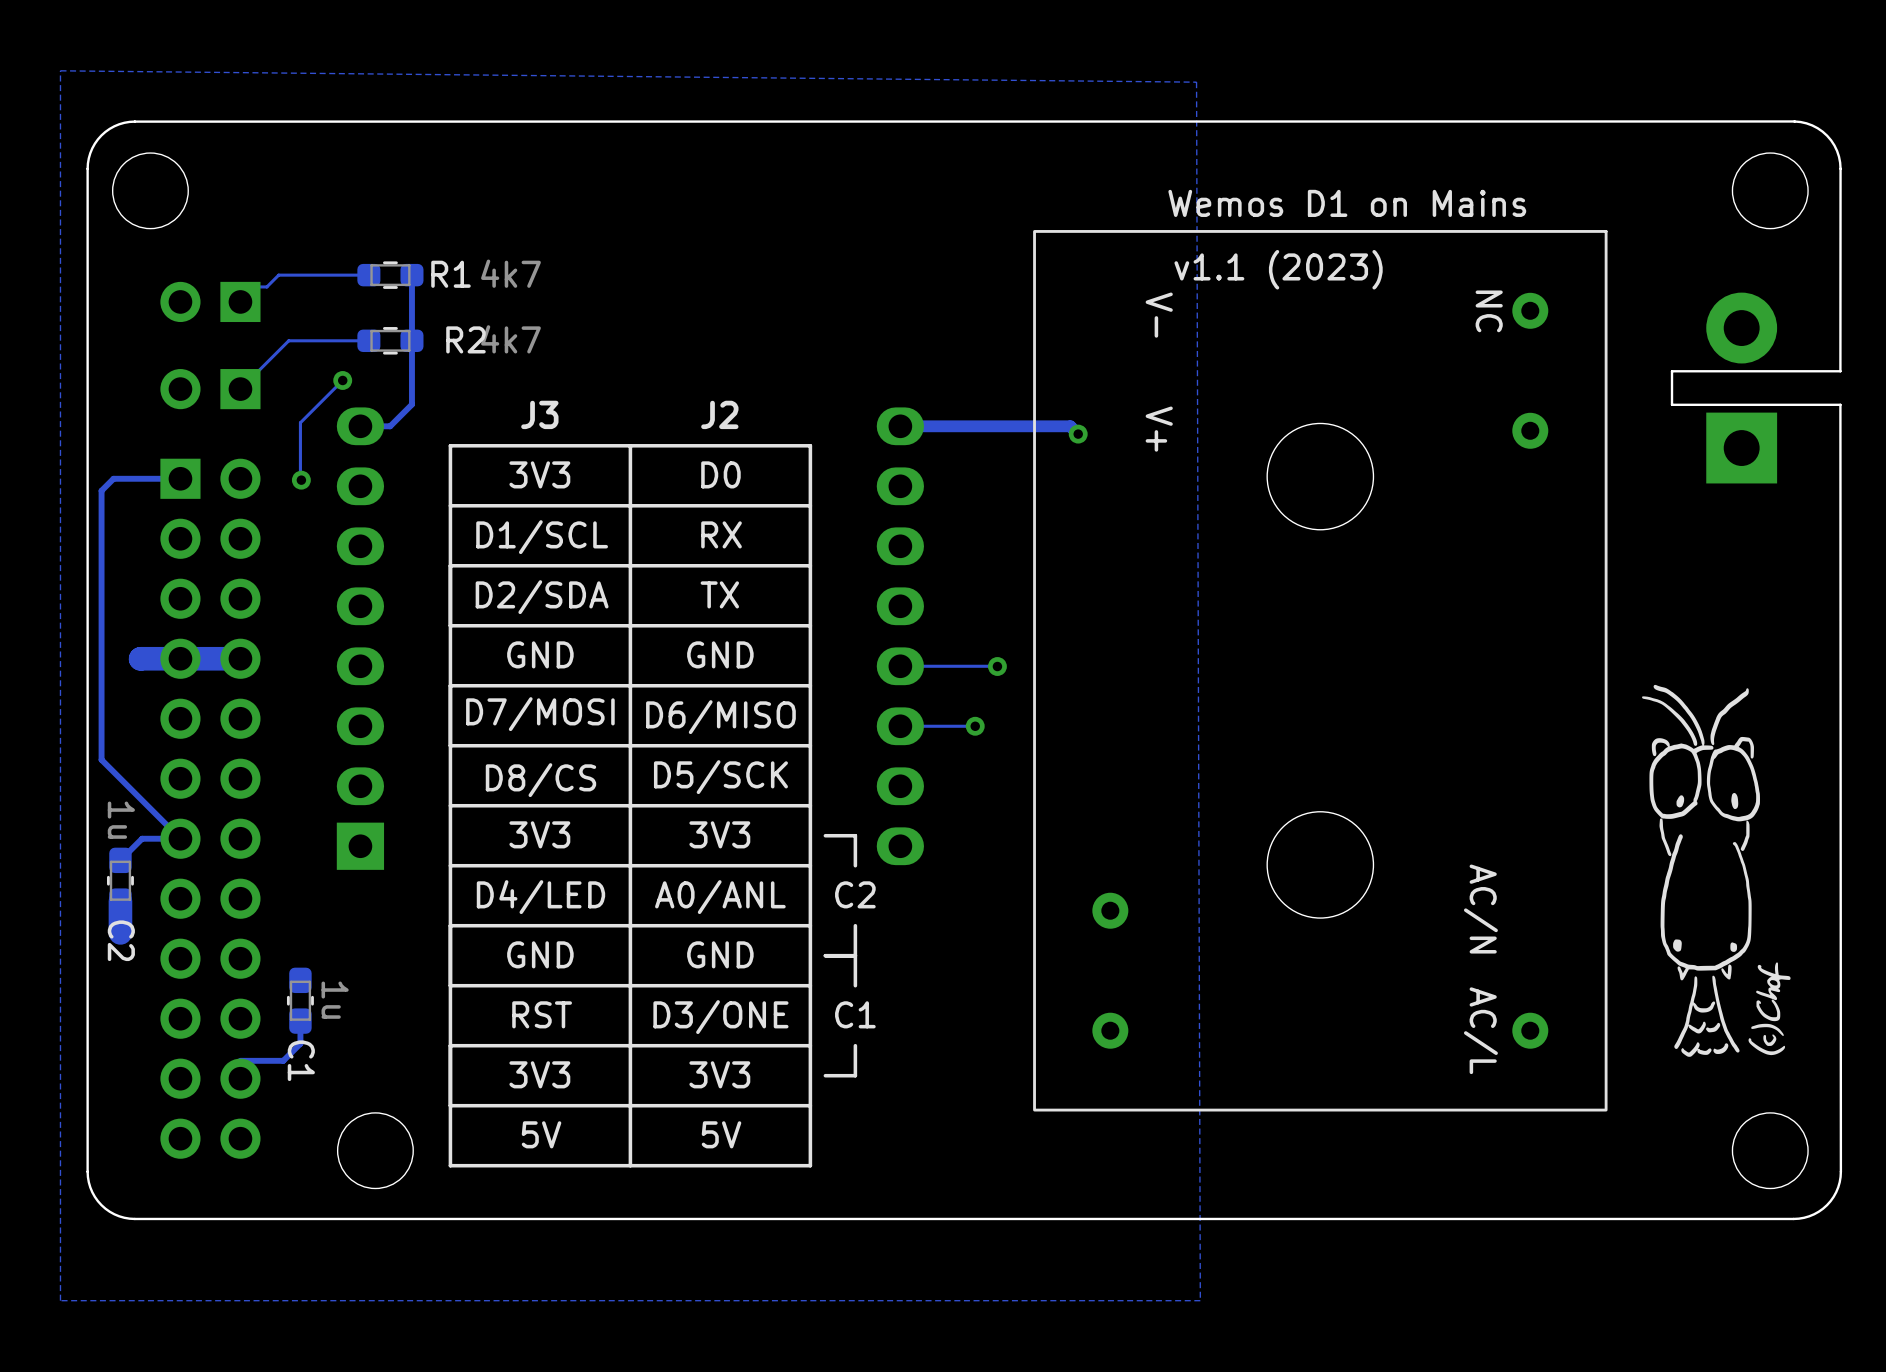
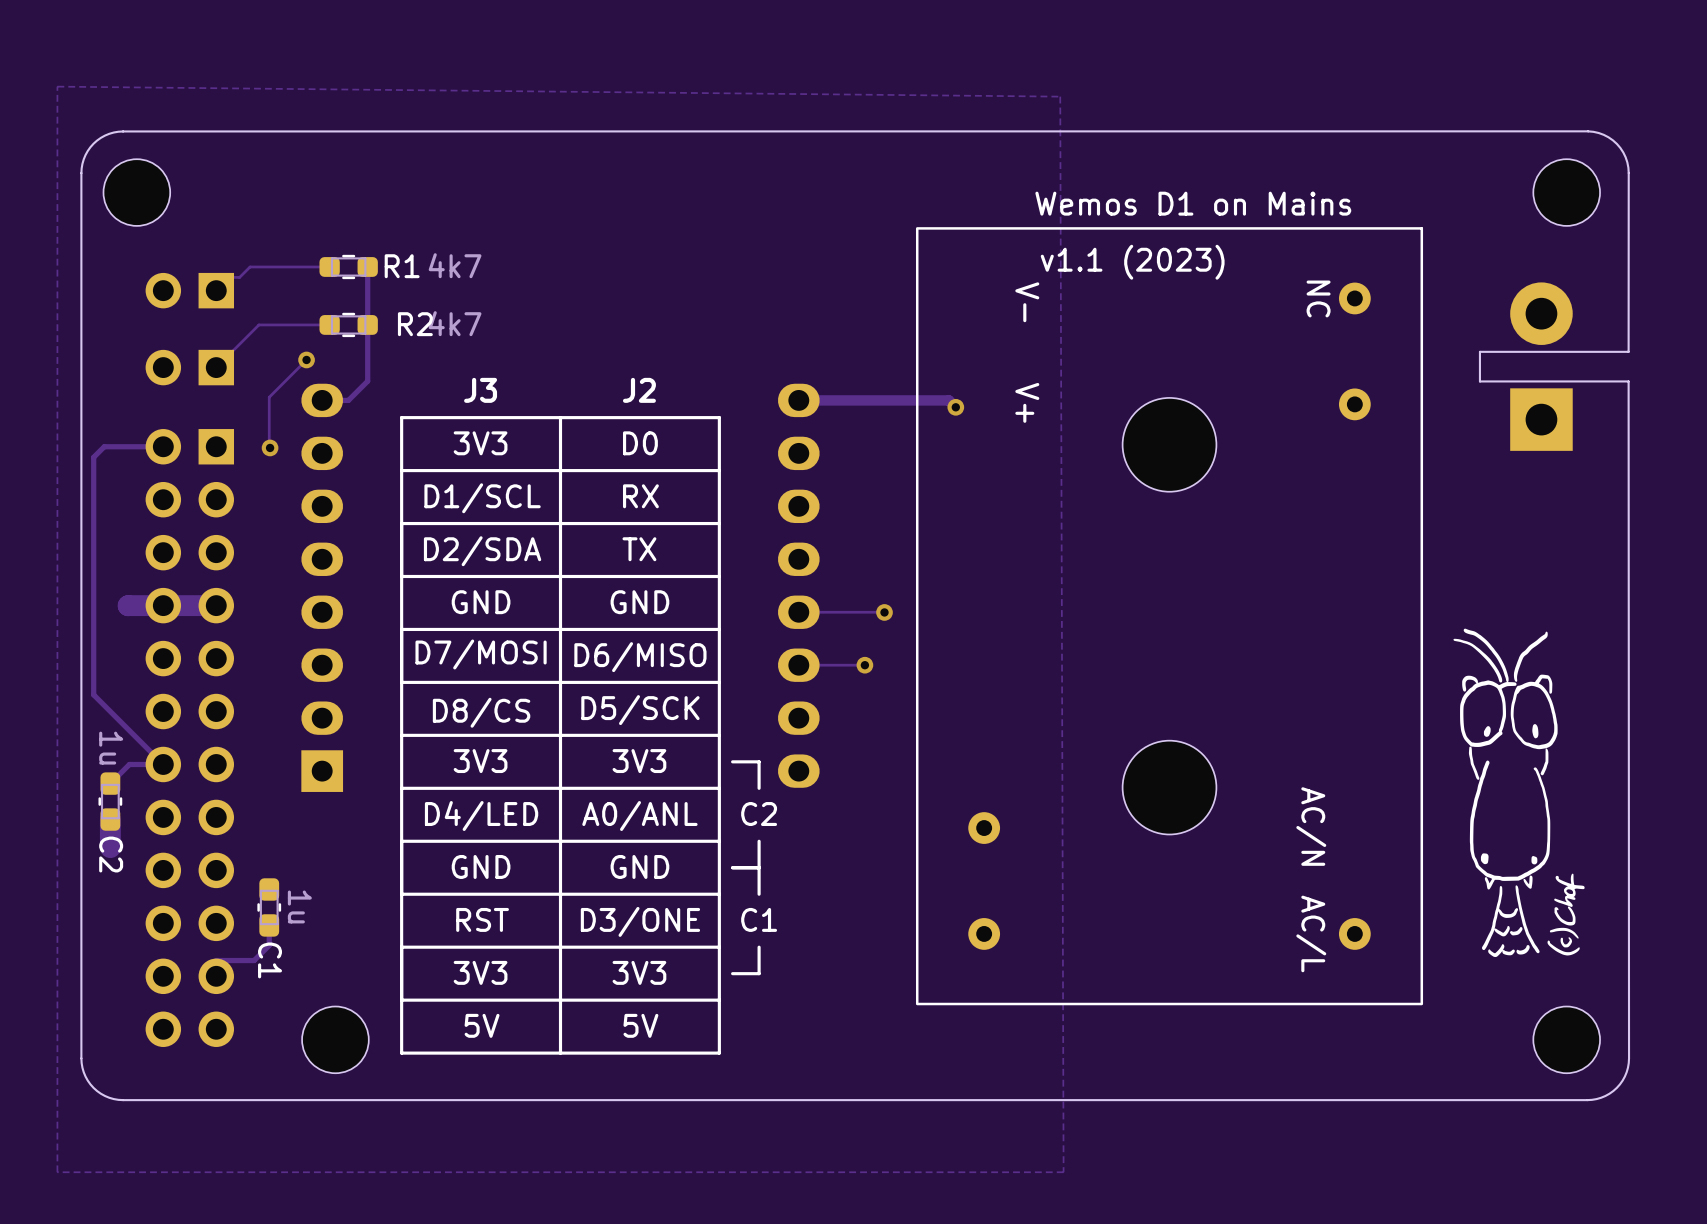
part footprint: [160, 458, 261, 1159] -> [145, 429, 235, 1047]

